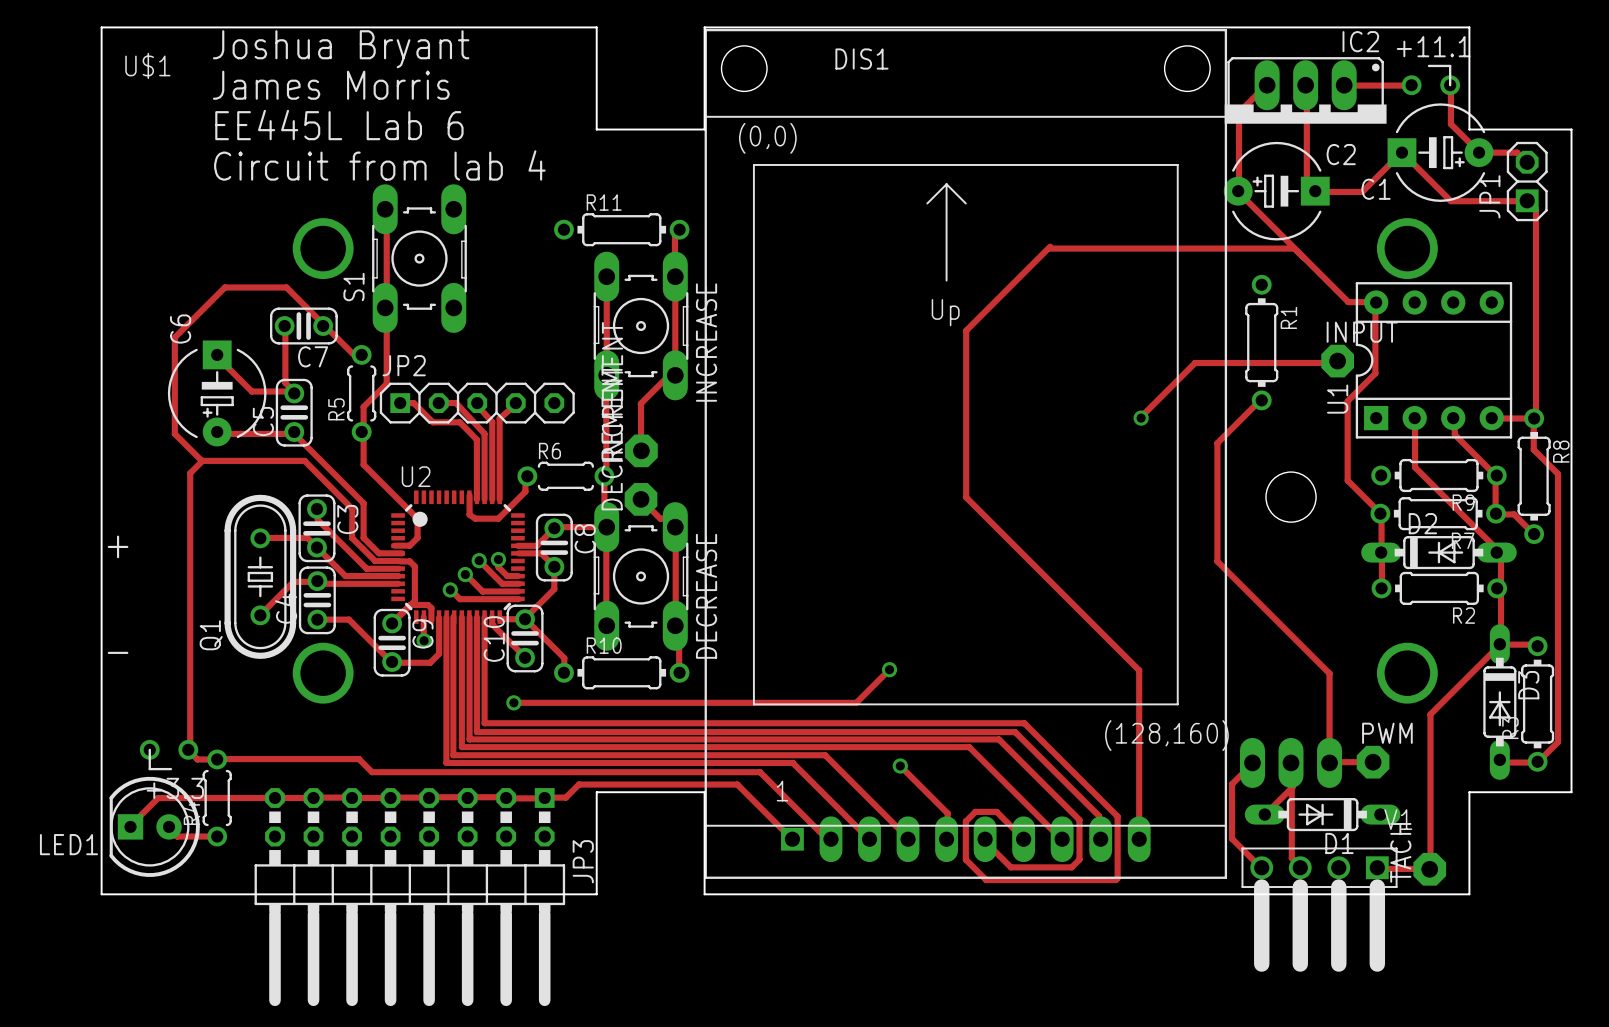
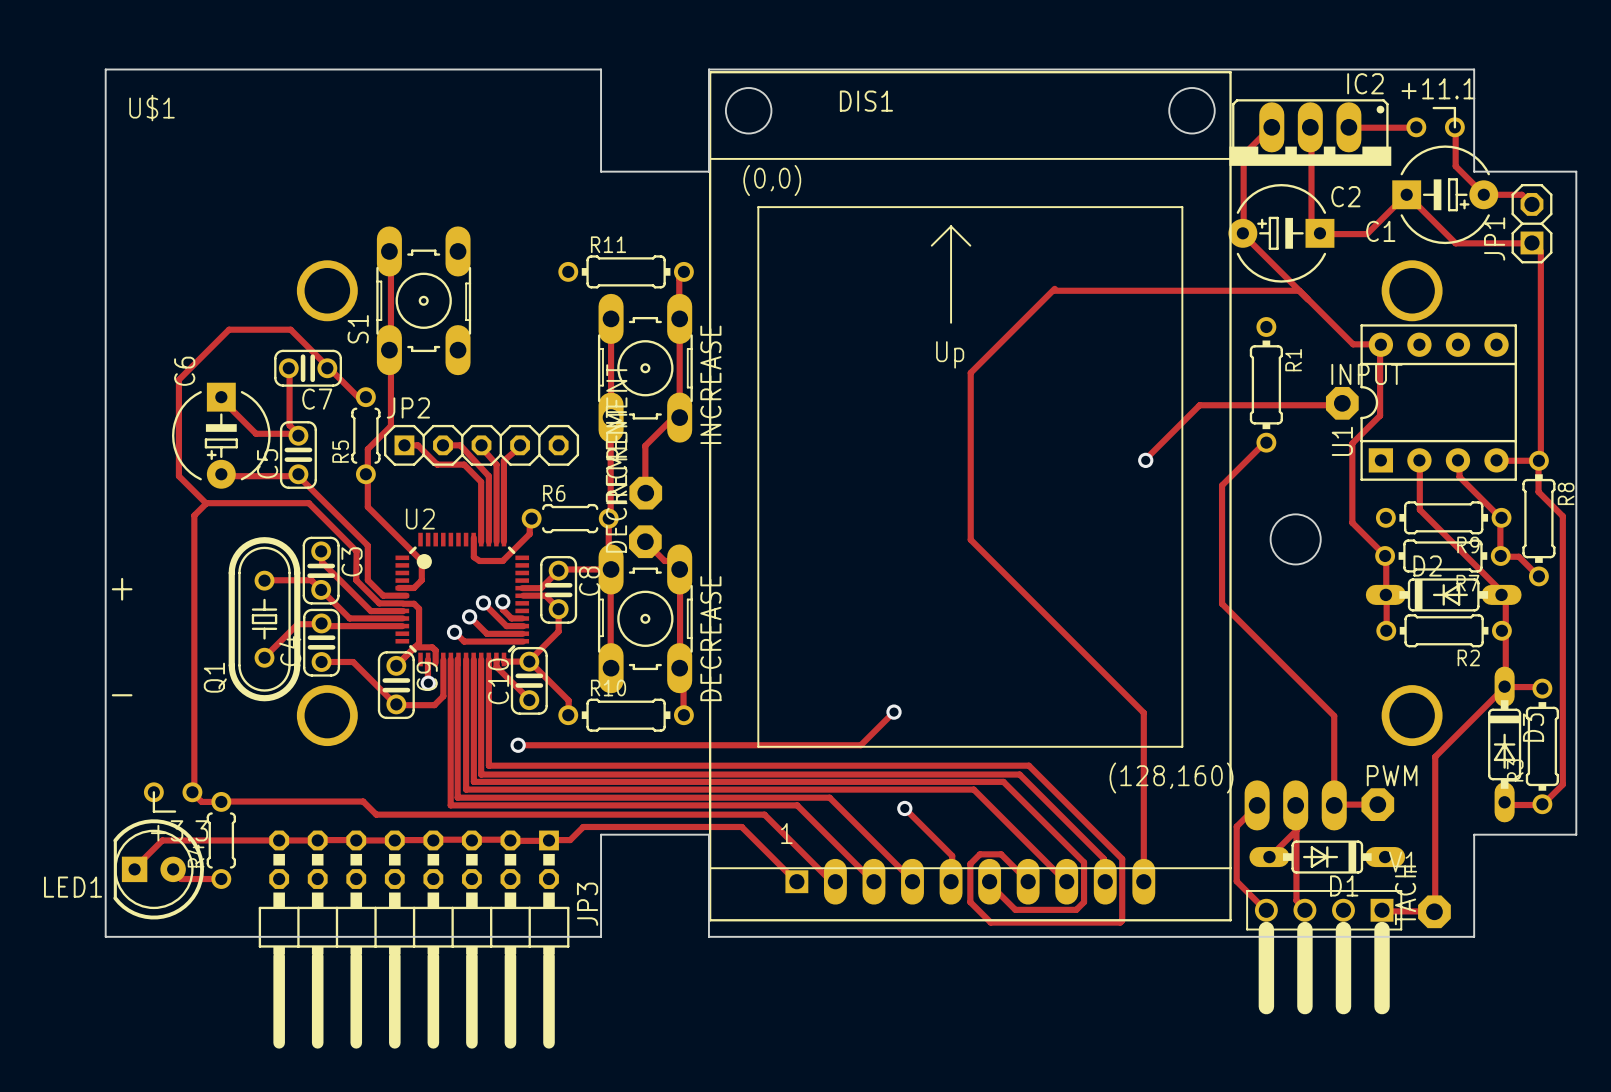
text: Joshua Bryant (341, 49) -> none
text: James Morris (331, 85) -> none
text: EE445L Lab 6 (339, 125) -> none
text: Circuit from lab 4 (379, 165) -> none

